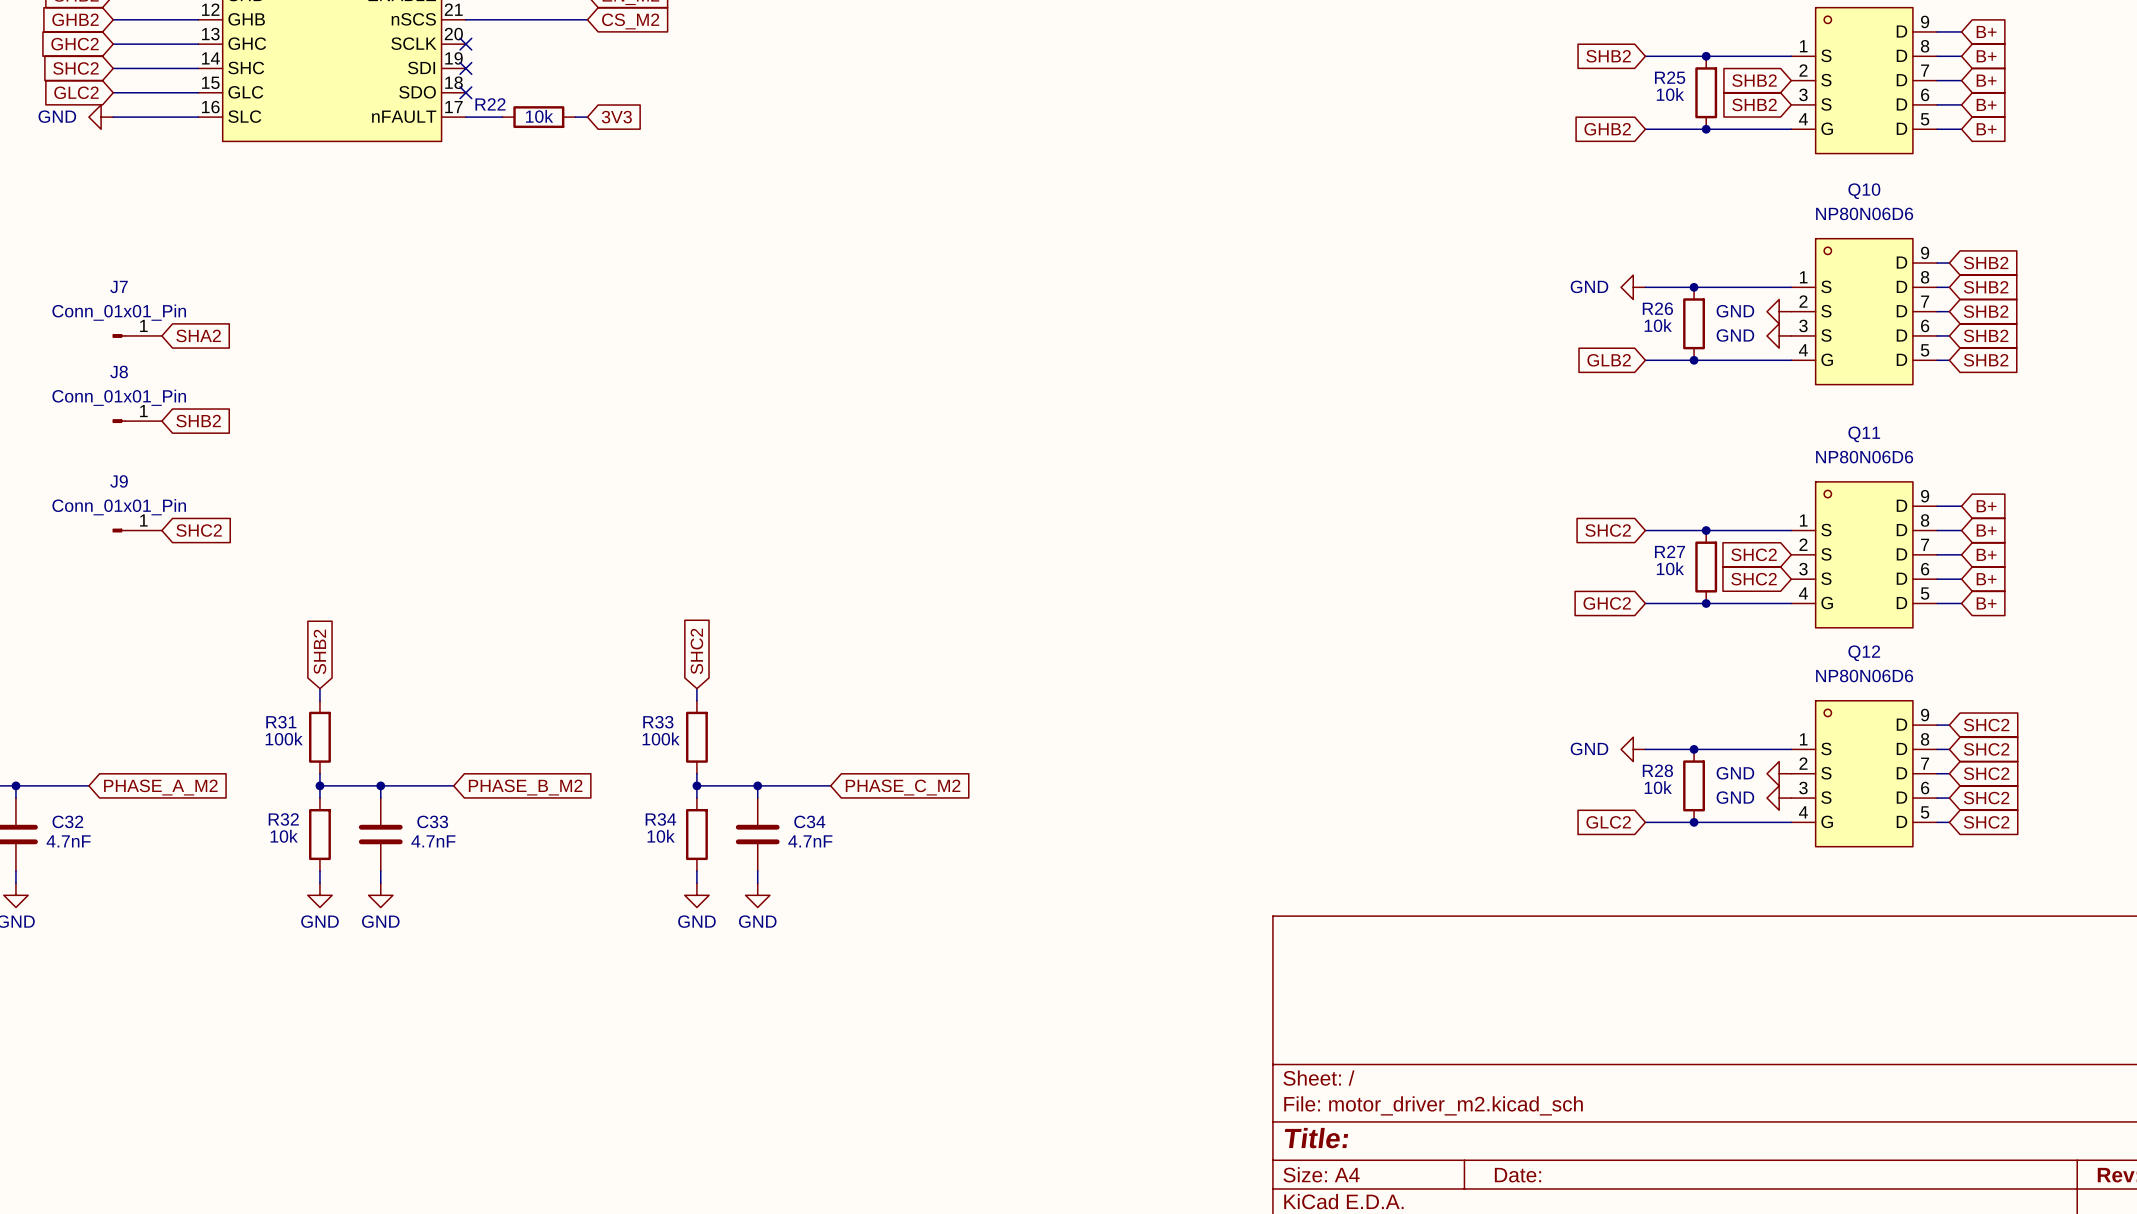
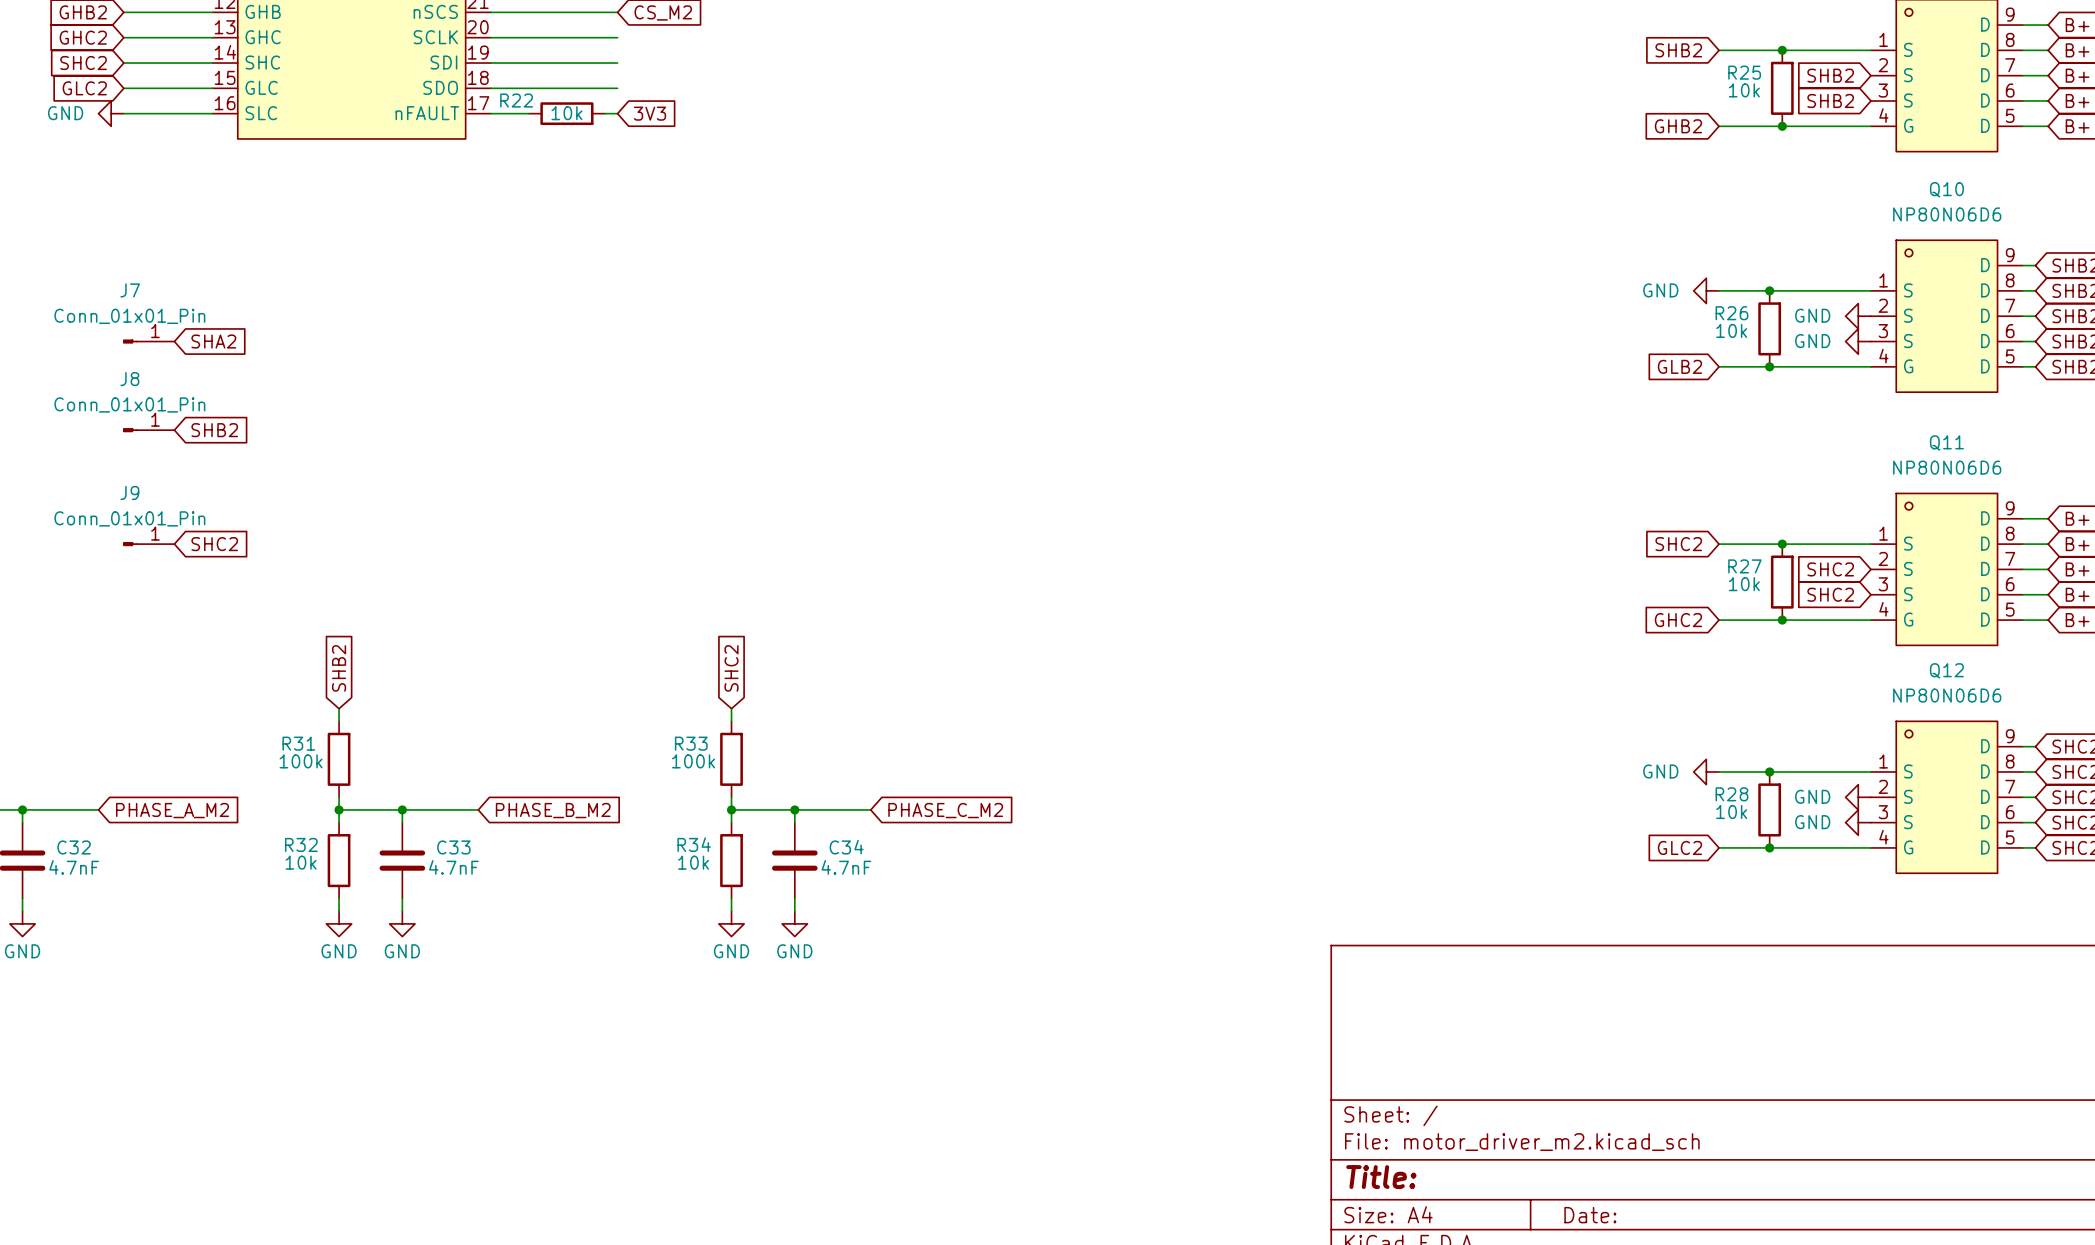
wire: none -> (490, 37) (617, 37)
no-connect mark: (465, 44) -> none
wire: none -> (490, 63) (617, 63)
no-connect mark: (465, 68) -> none
wire: none -> (490, 88) (617, 88)
no-connect mark: (465, 92) -> none

